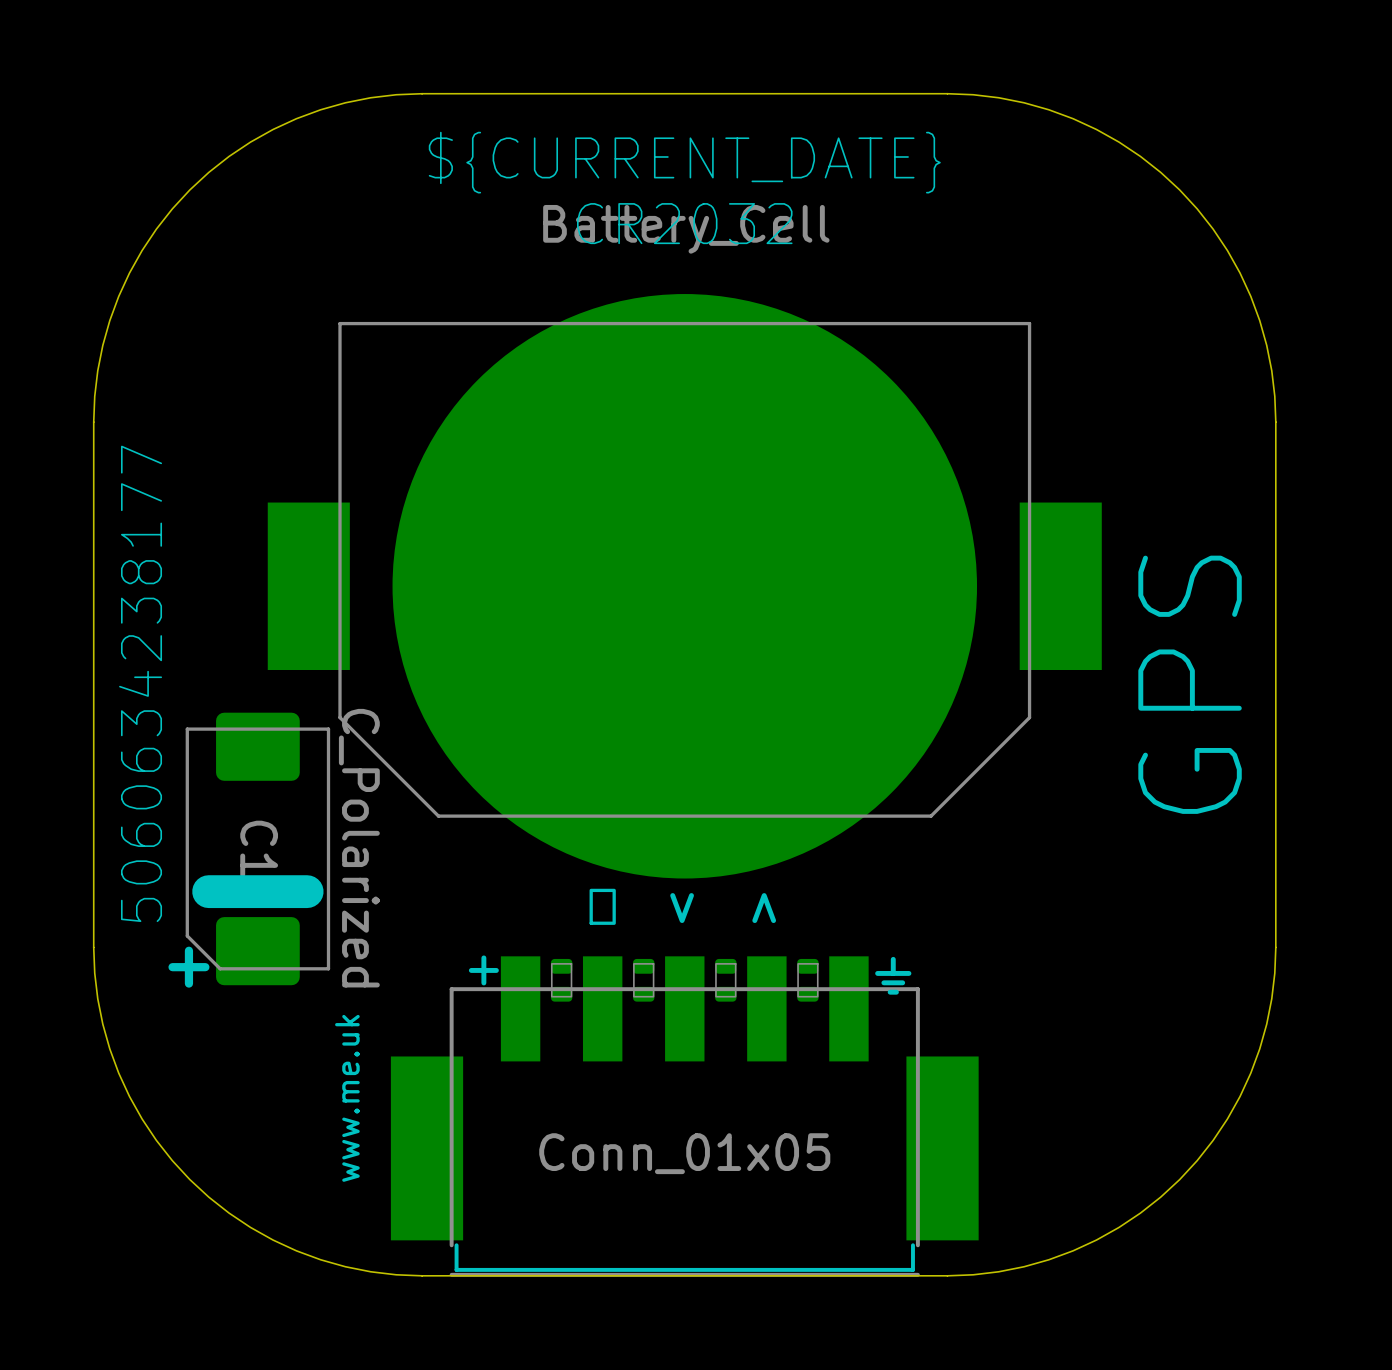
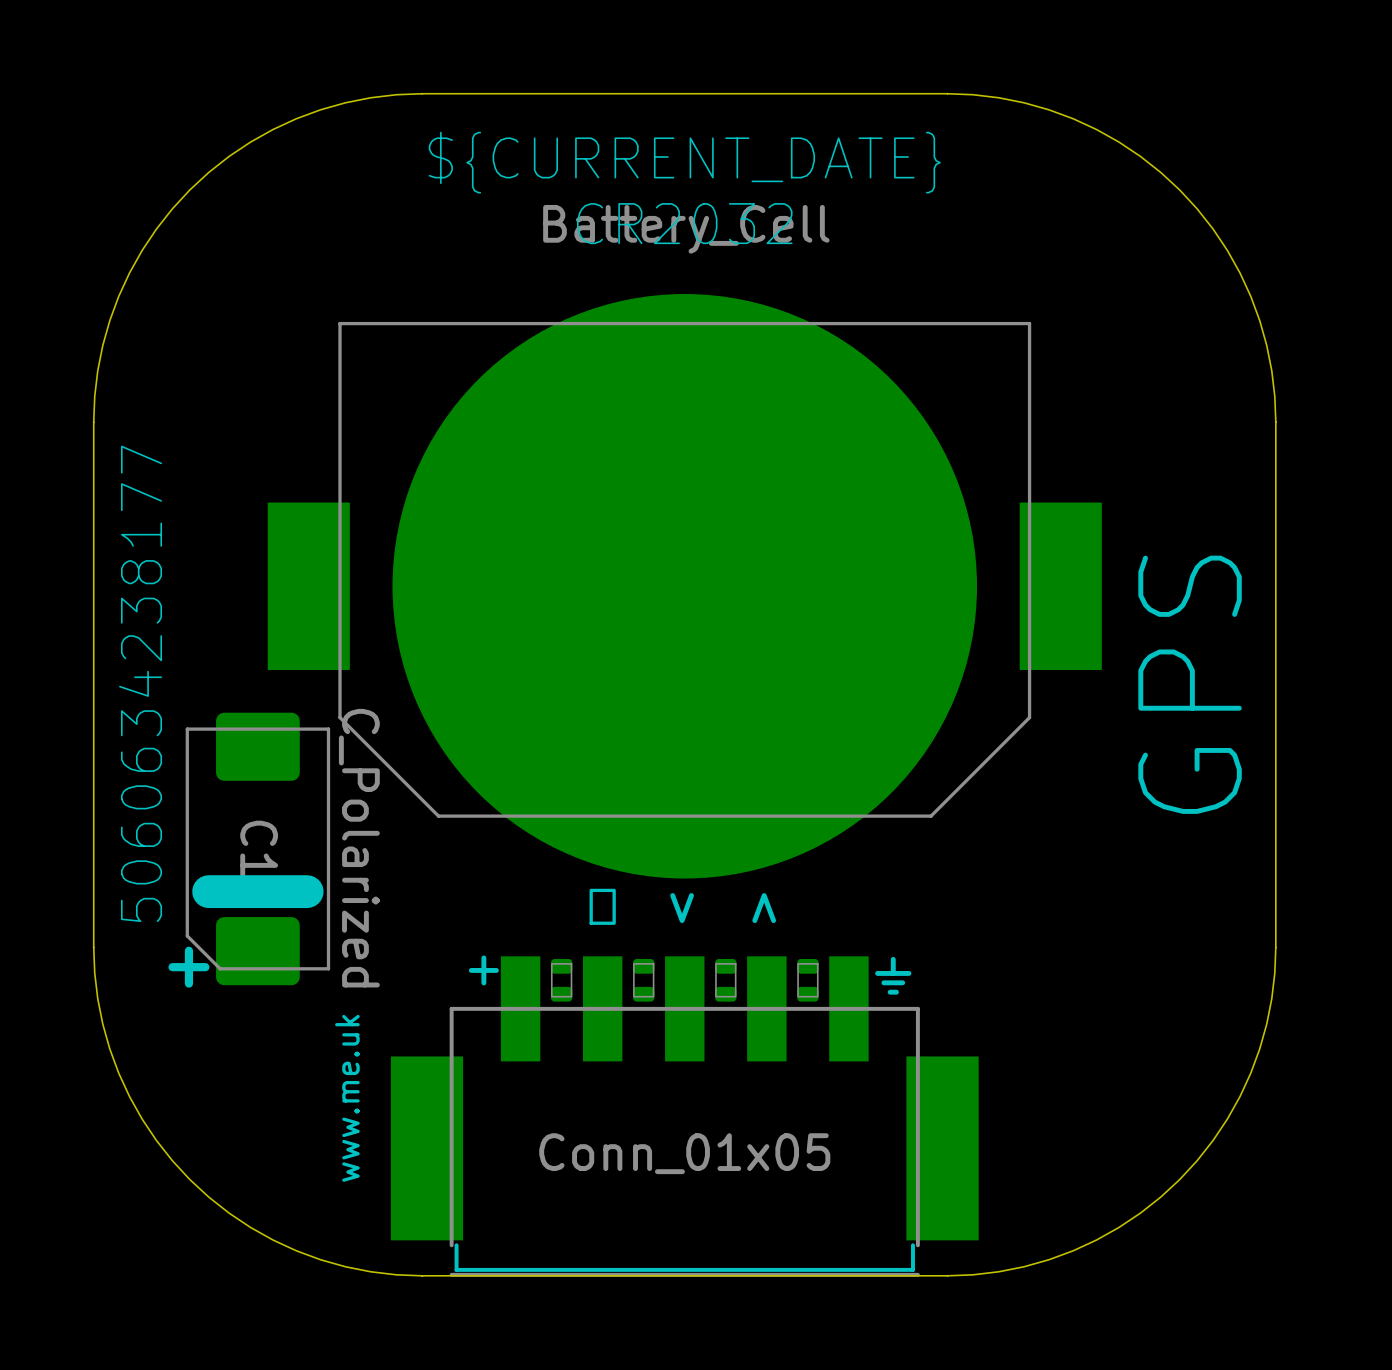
part footprint: [390, 956, 979, 1277] -> [390, 956, 979, 1277]

